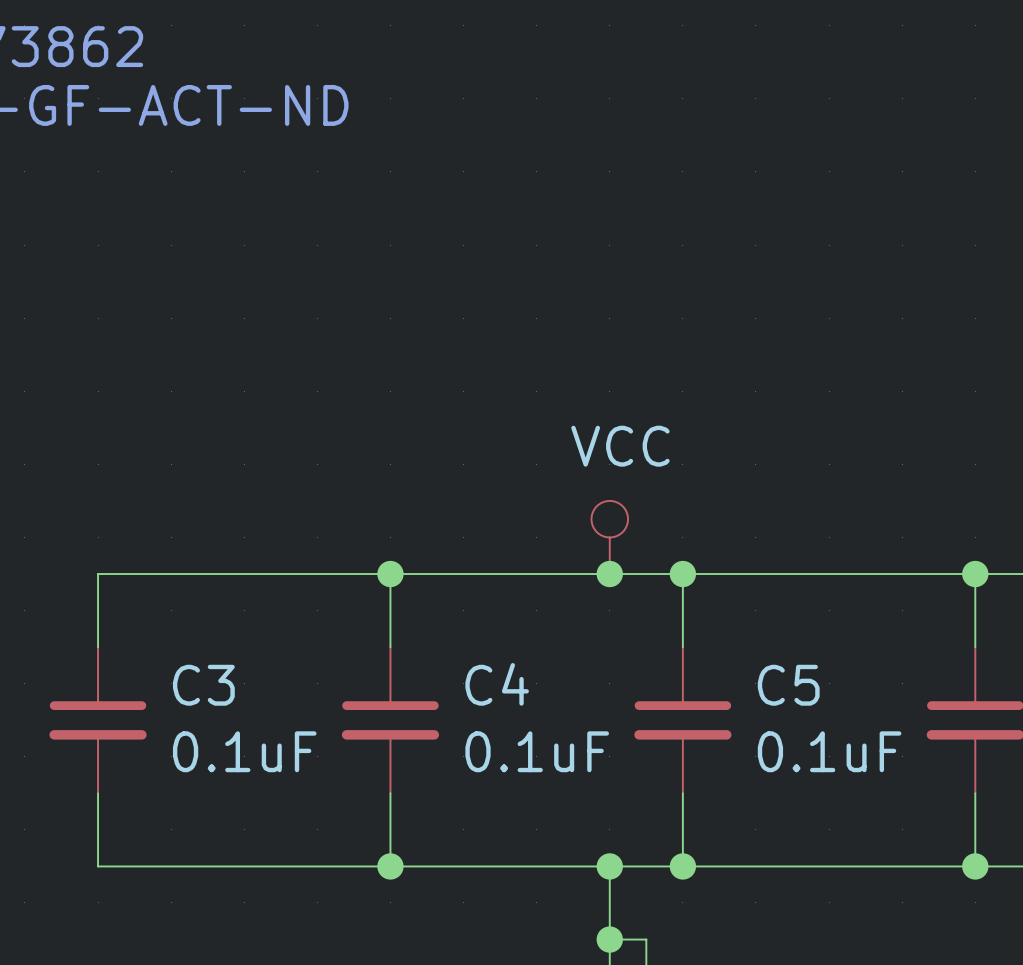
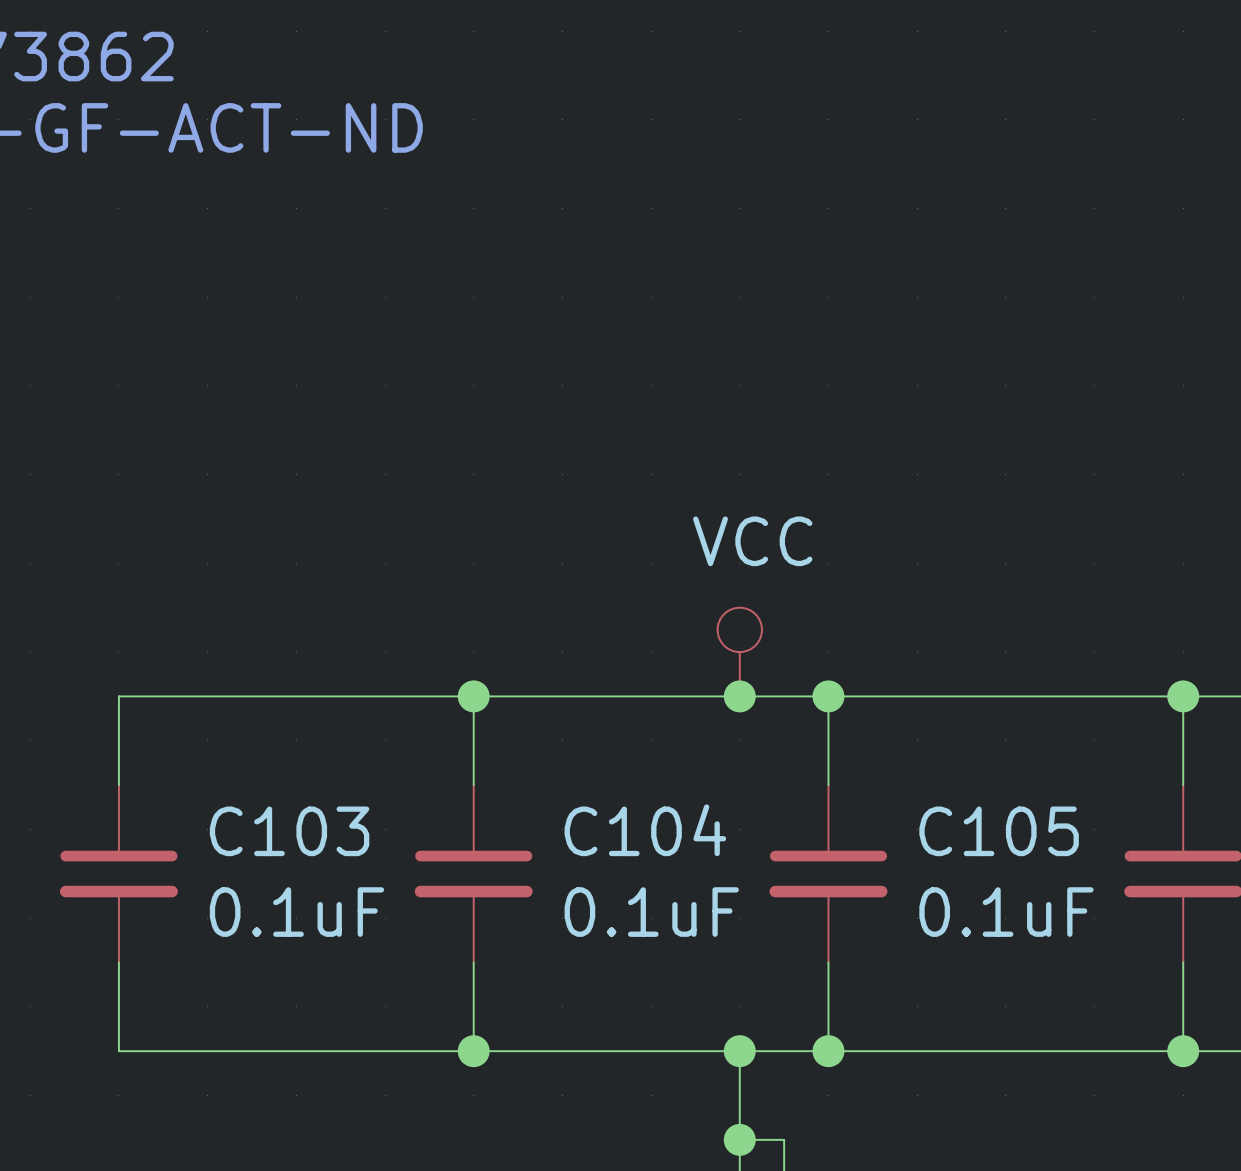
C4 name: C4 (497, 684) -> C104 (645, 830)
C3 name: C3 (203, 685) -> C103 (289, 831)
C5 name: C5 (788, 685) -> C105 (999, 831)

